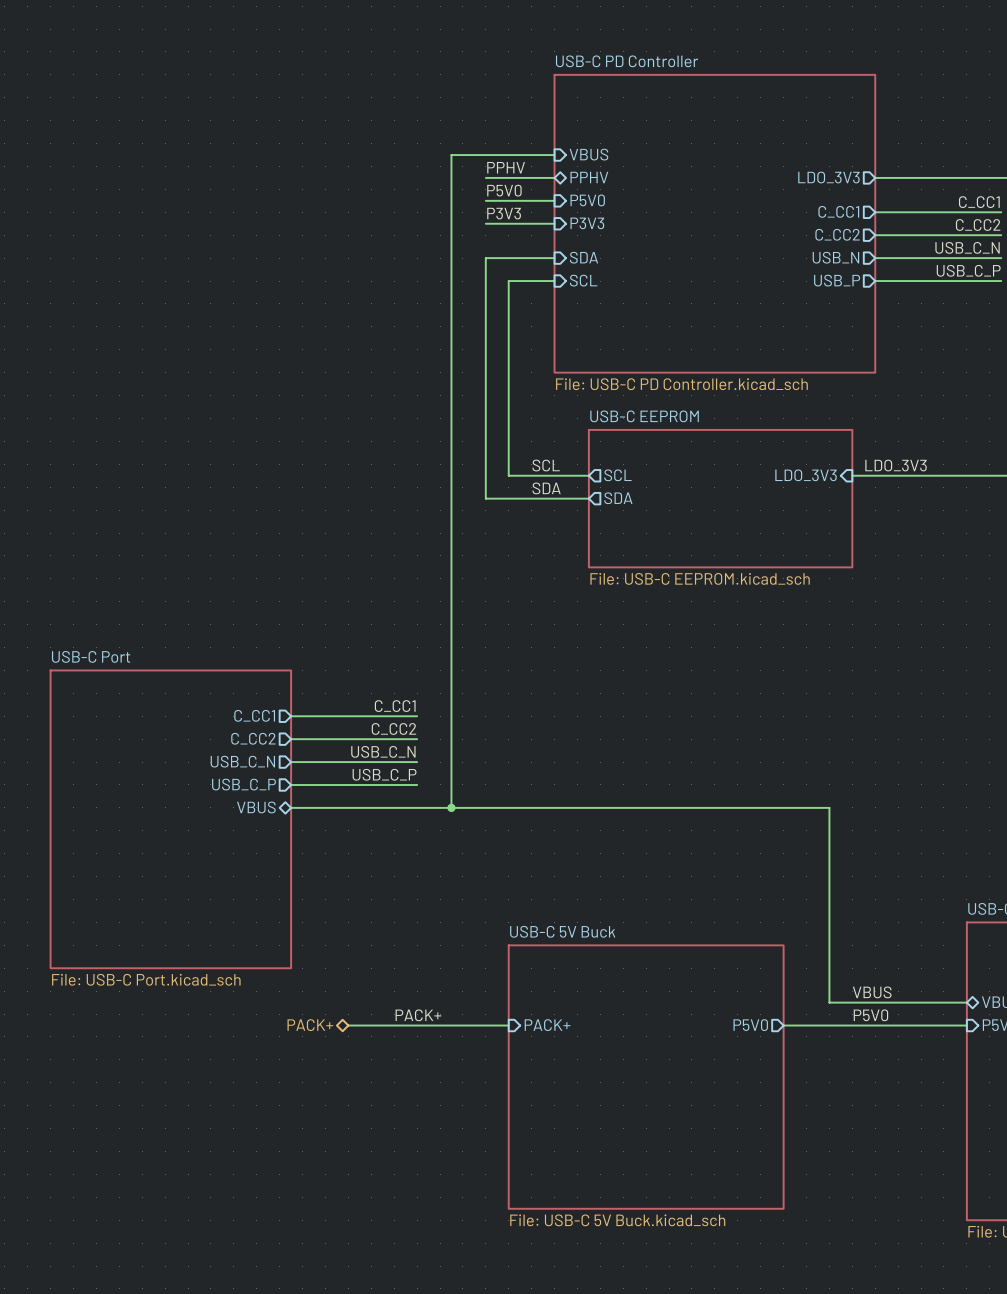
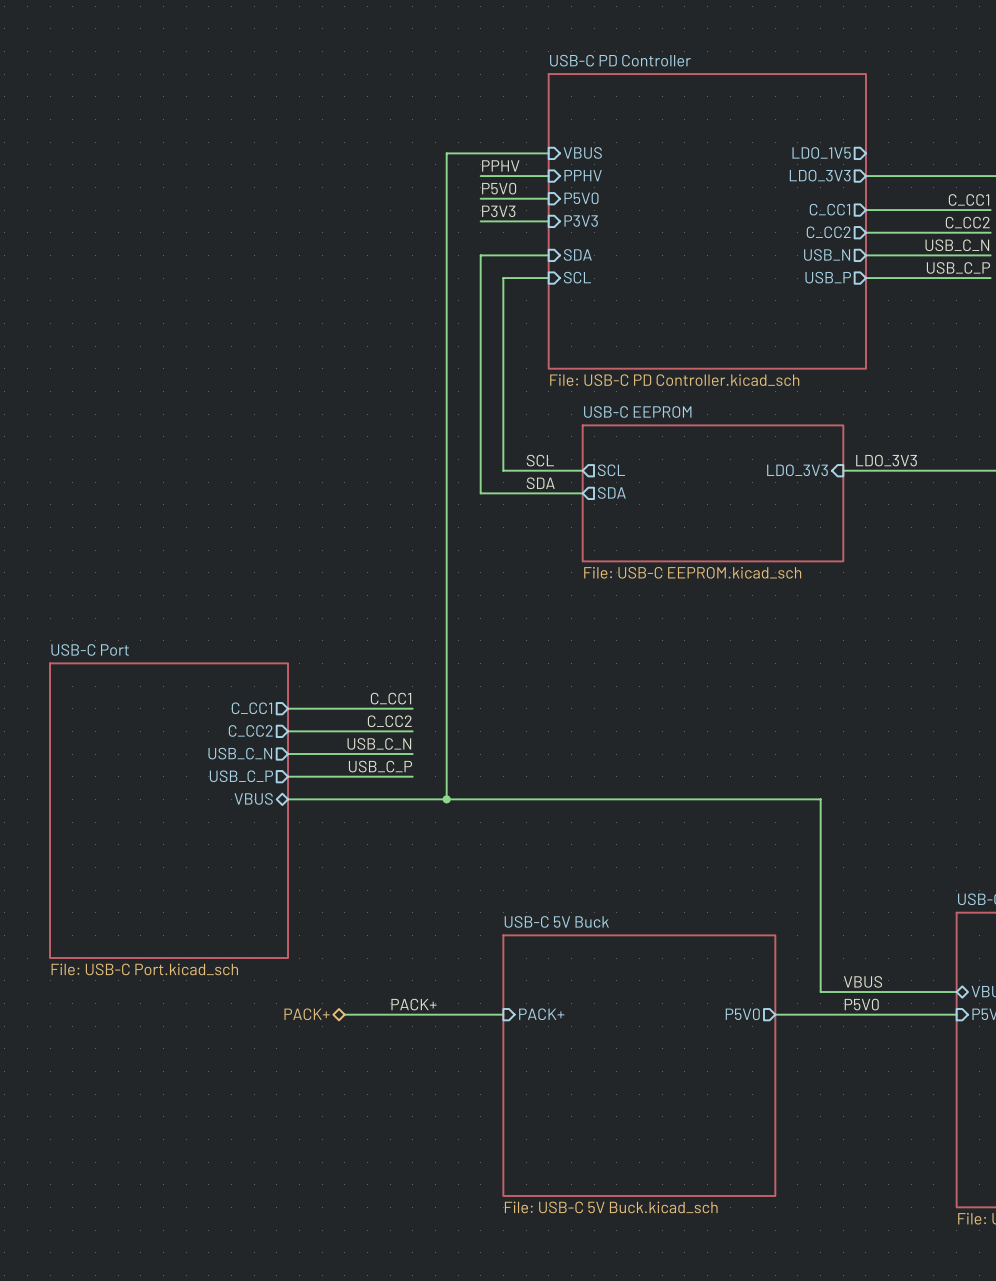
sheet pin: none -> LDO_1V5 (821, 152)
sheet pin shape: bidirectional (589, 177) -> input (583, 175)

